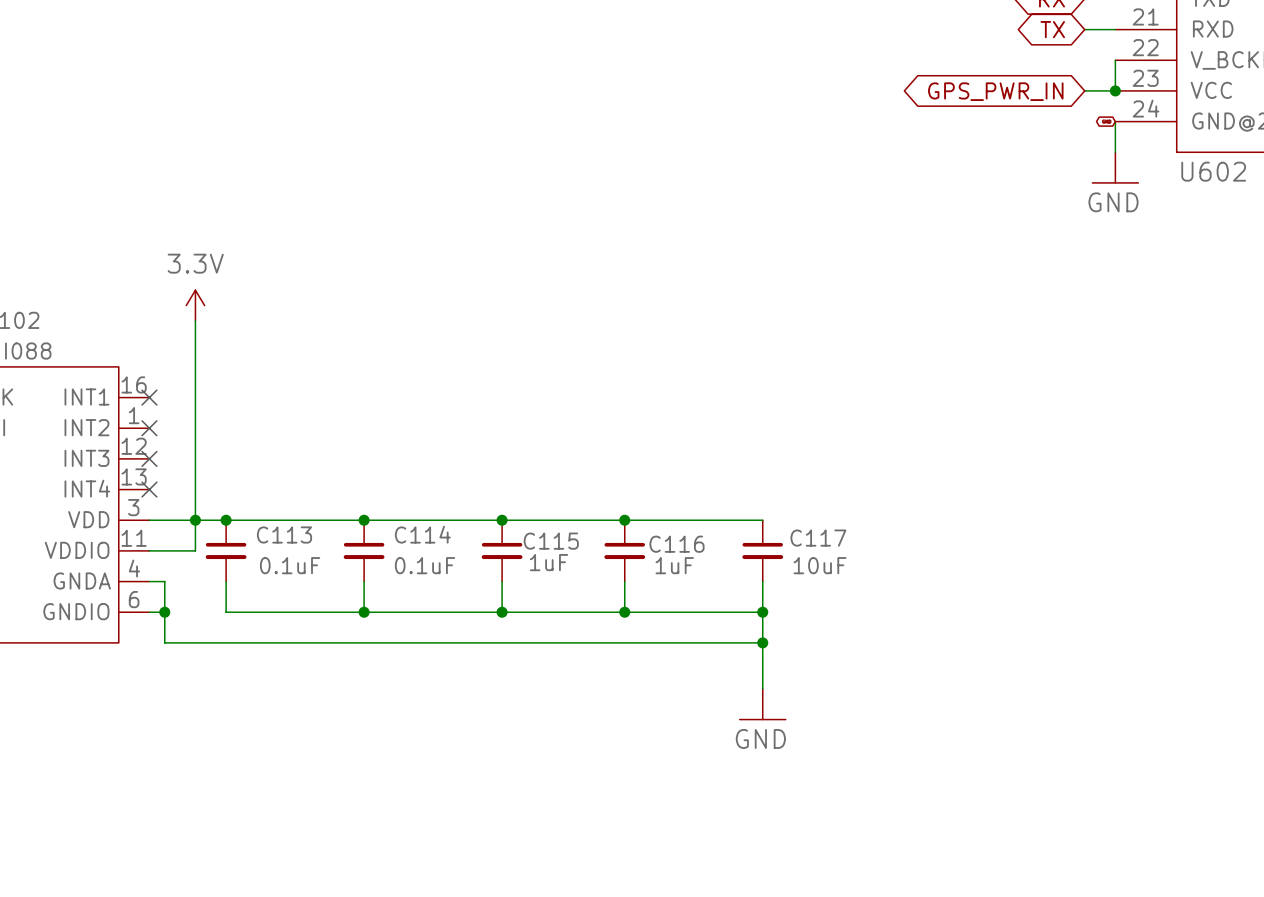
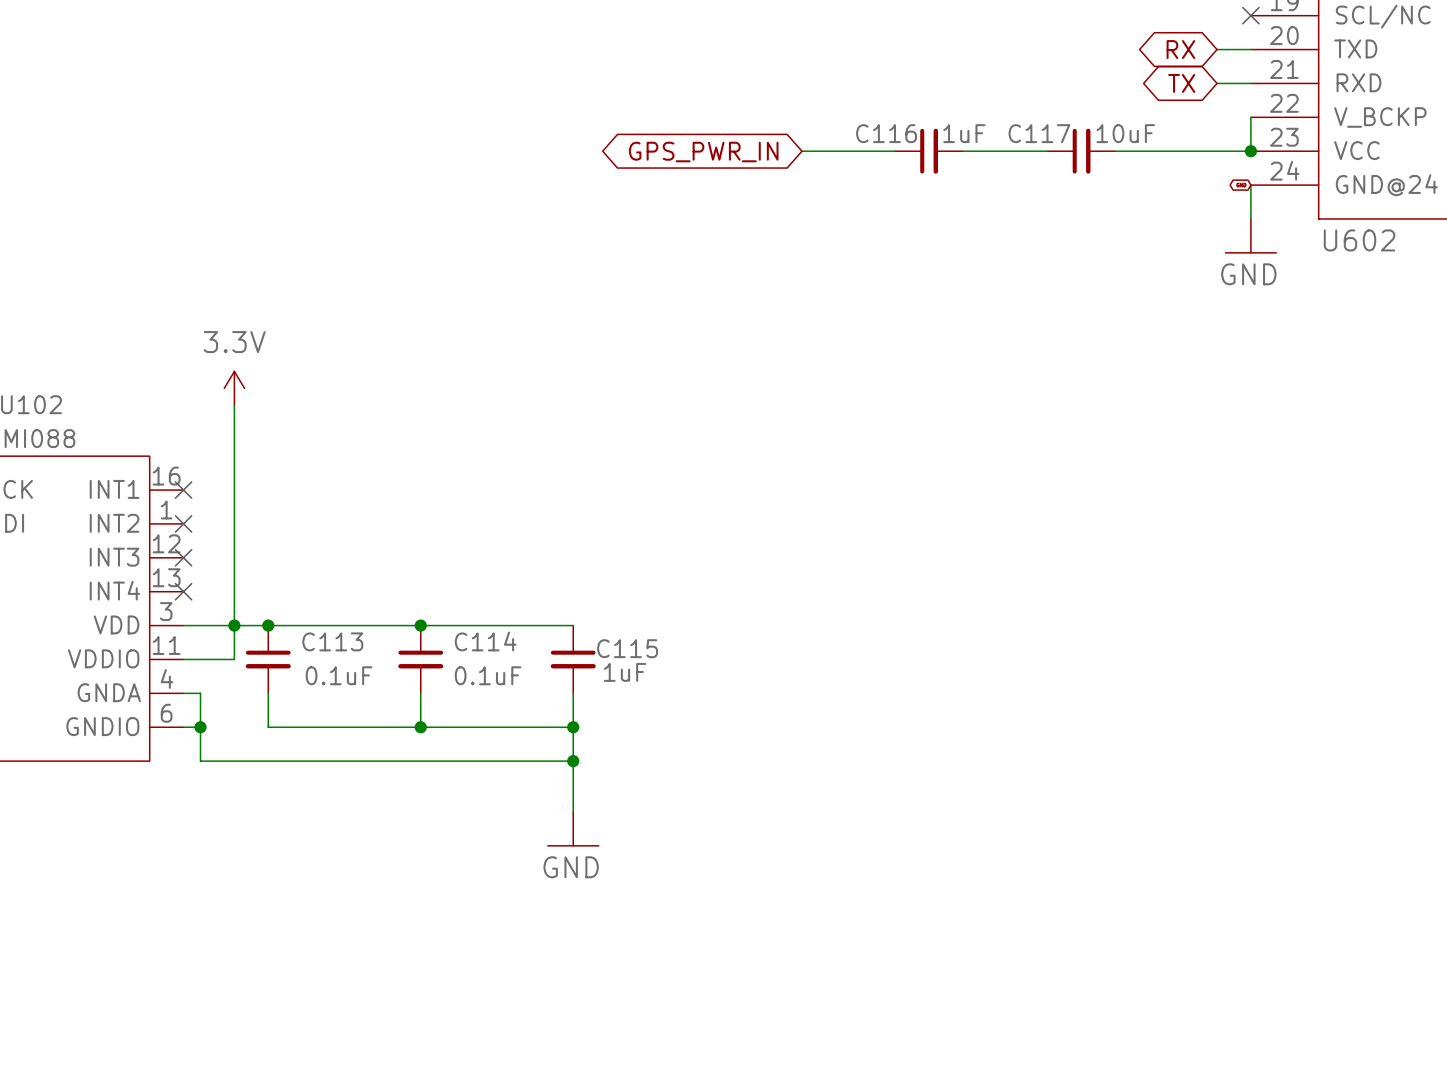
wire: none -> (801, 151) (895, 151)
wire: none -> (962, 151) (1047, 151)
wire: none -> (1115, 151) (1217, 151)
global label: none -> GPS_PWR_IN (703, 152)
global label: GPS_PWR_IN (995, 91) -> none
wire: (502, 520) (762, 520) -> none
junction: (502, 520) -> none
junction: (624, 520) -> none
C117 name position: C117 (818, 538) -> C117 (1039, 133)
C116 name position: C116 (676, 544) -> C116 (886, 133)
C116 rotation: 0° (624, 550) -> 90° counterclockwise (929, 151)
C116 position: (624, 550) -> (929, 151)
C117 rotation: 0° (762, 550) -> 90° counterclockwise (1081, 151)
C117 position: (762, 550) -> (1081, 151)
C116 value position: 1uF (674, 565) -> 1uF (964, 133)
C117 value position: 10uF (820, 565) -> 10uF (1125, 133)
wire: (624, 581) (624, 612) -> none
wire: (762, 581) (762, 688) -> none
wire: (502, 612) (762, 612) -> (573, 727) (573, 811)
junction: (624, 612) -> none
junction: (762, 612) -> none
wire: (502, 642) (762, 642) -> none
junction: none -> (573, 761)
junction: (762, 642) -> none
power symbol position: GND (762, 704) -> GND (573, 828)

